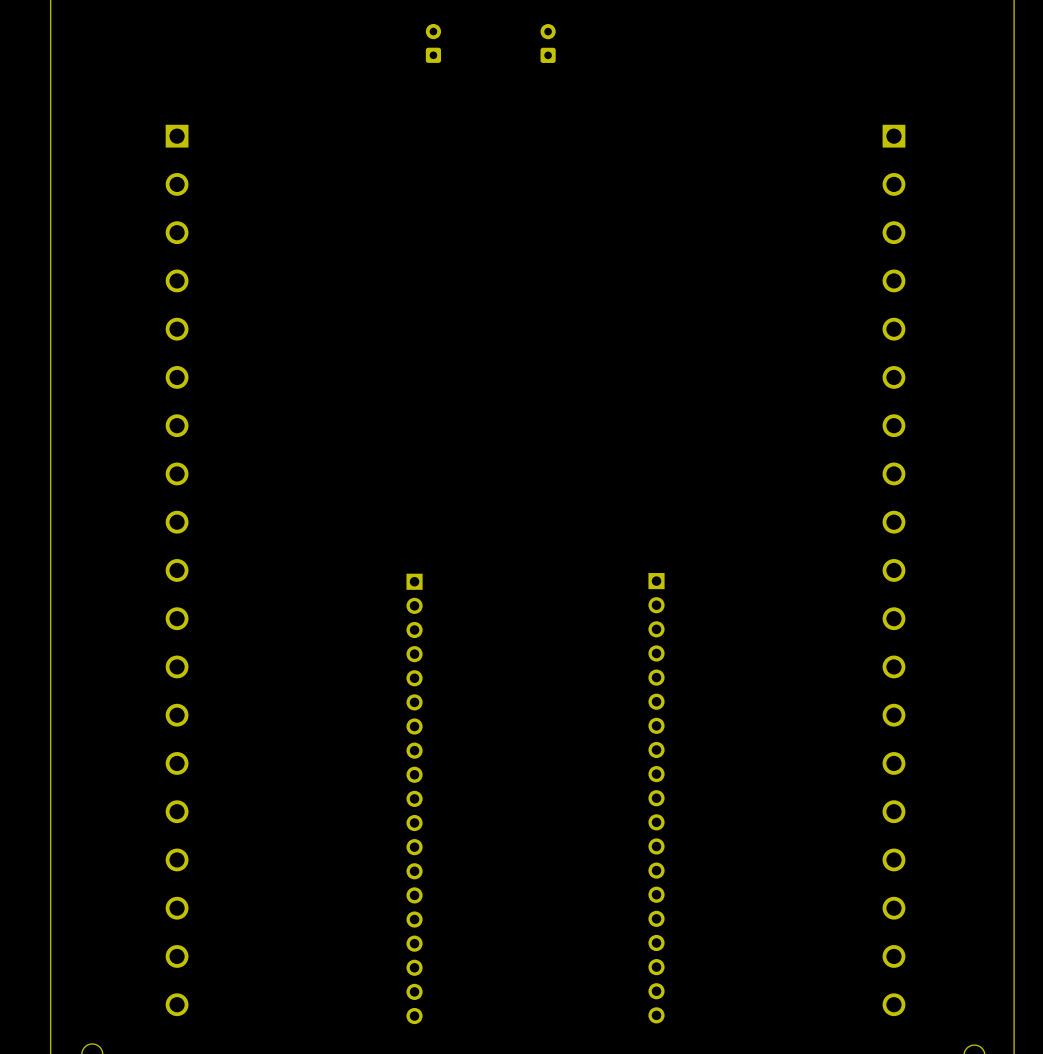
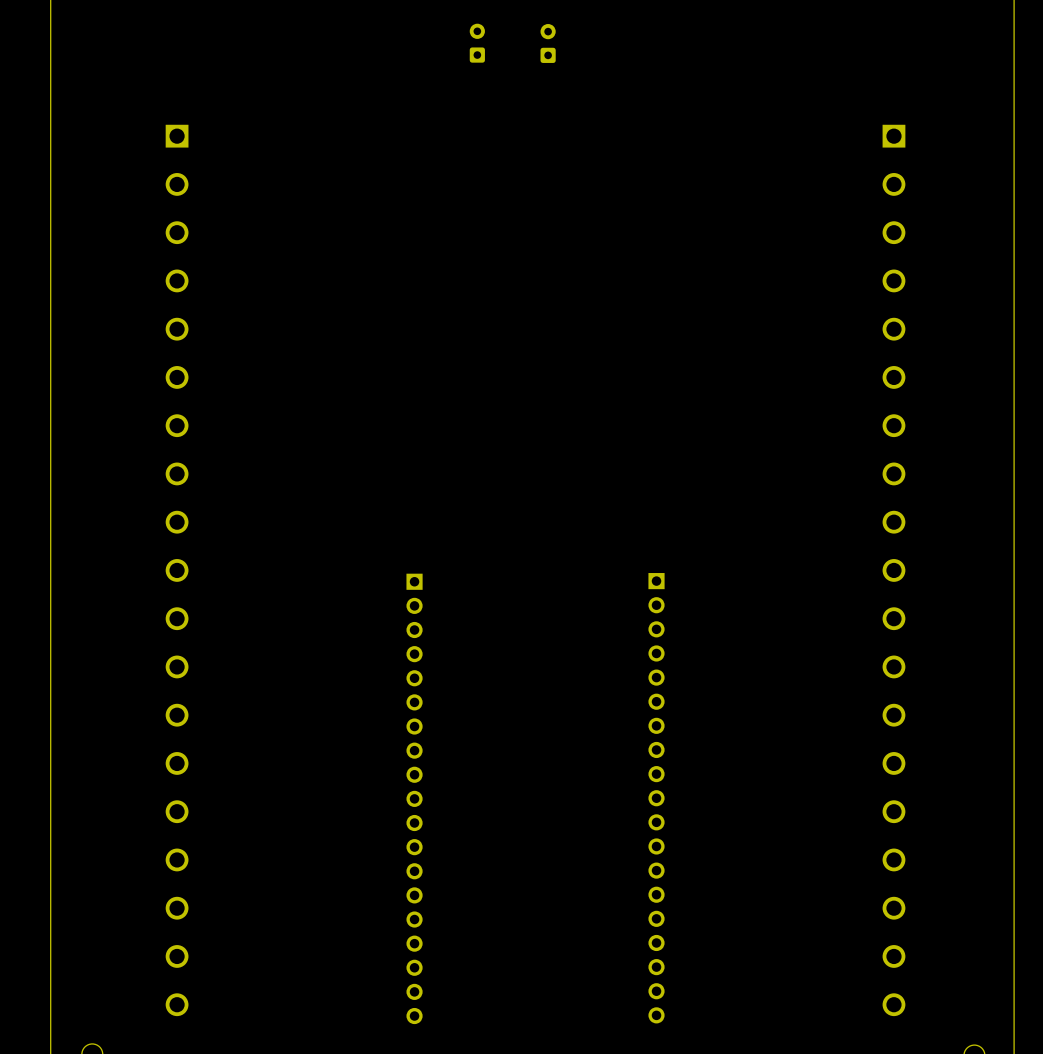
part position: (433, 43) -> (477, 43)

